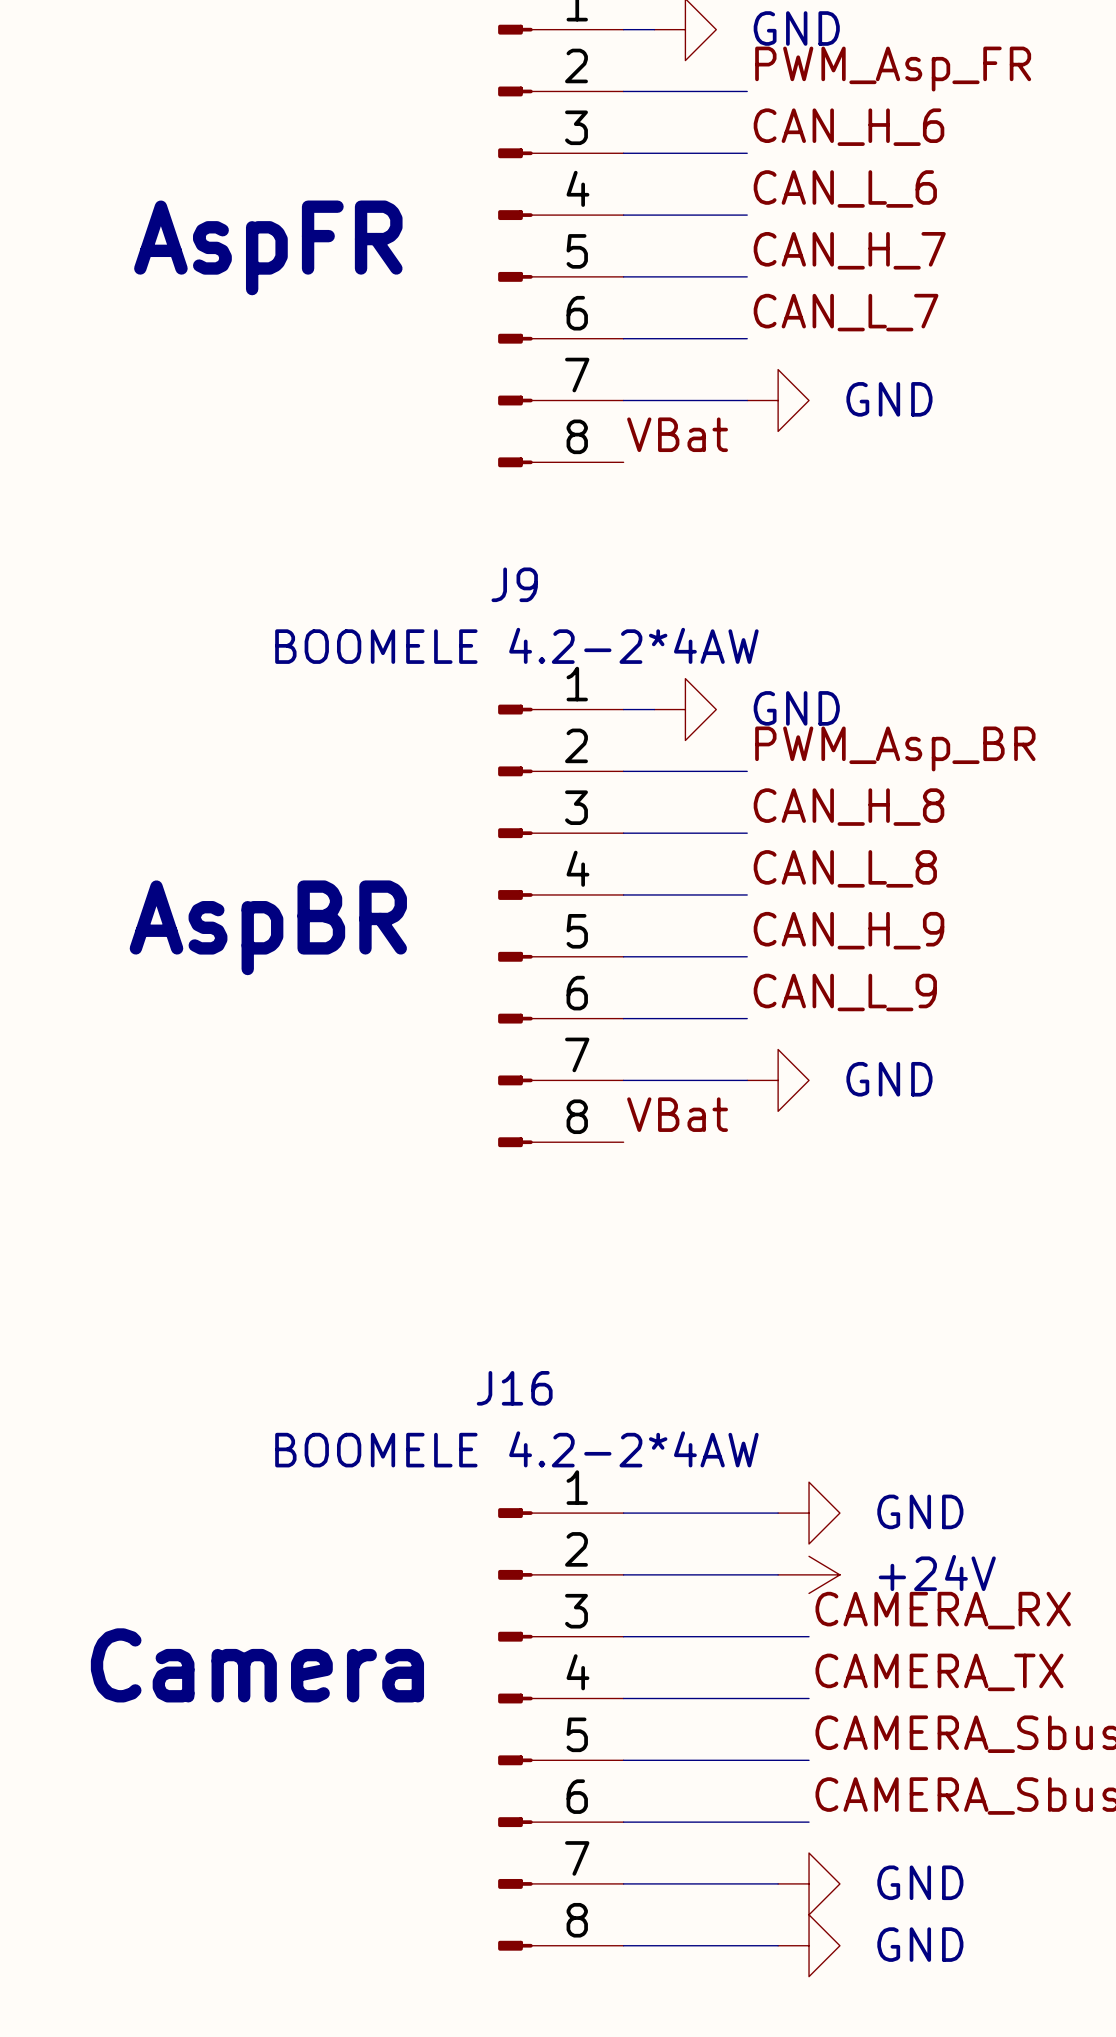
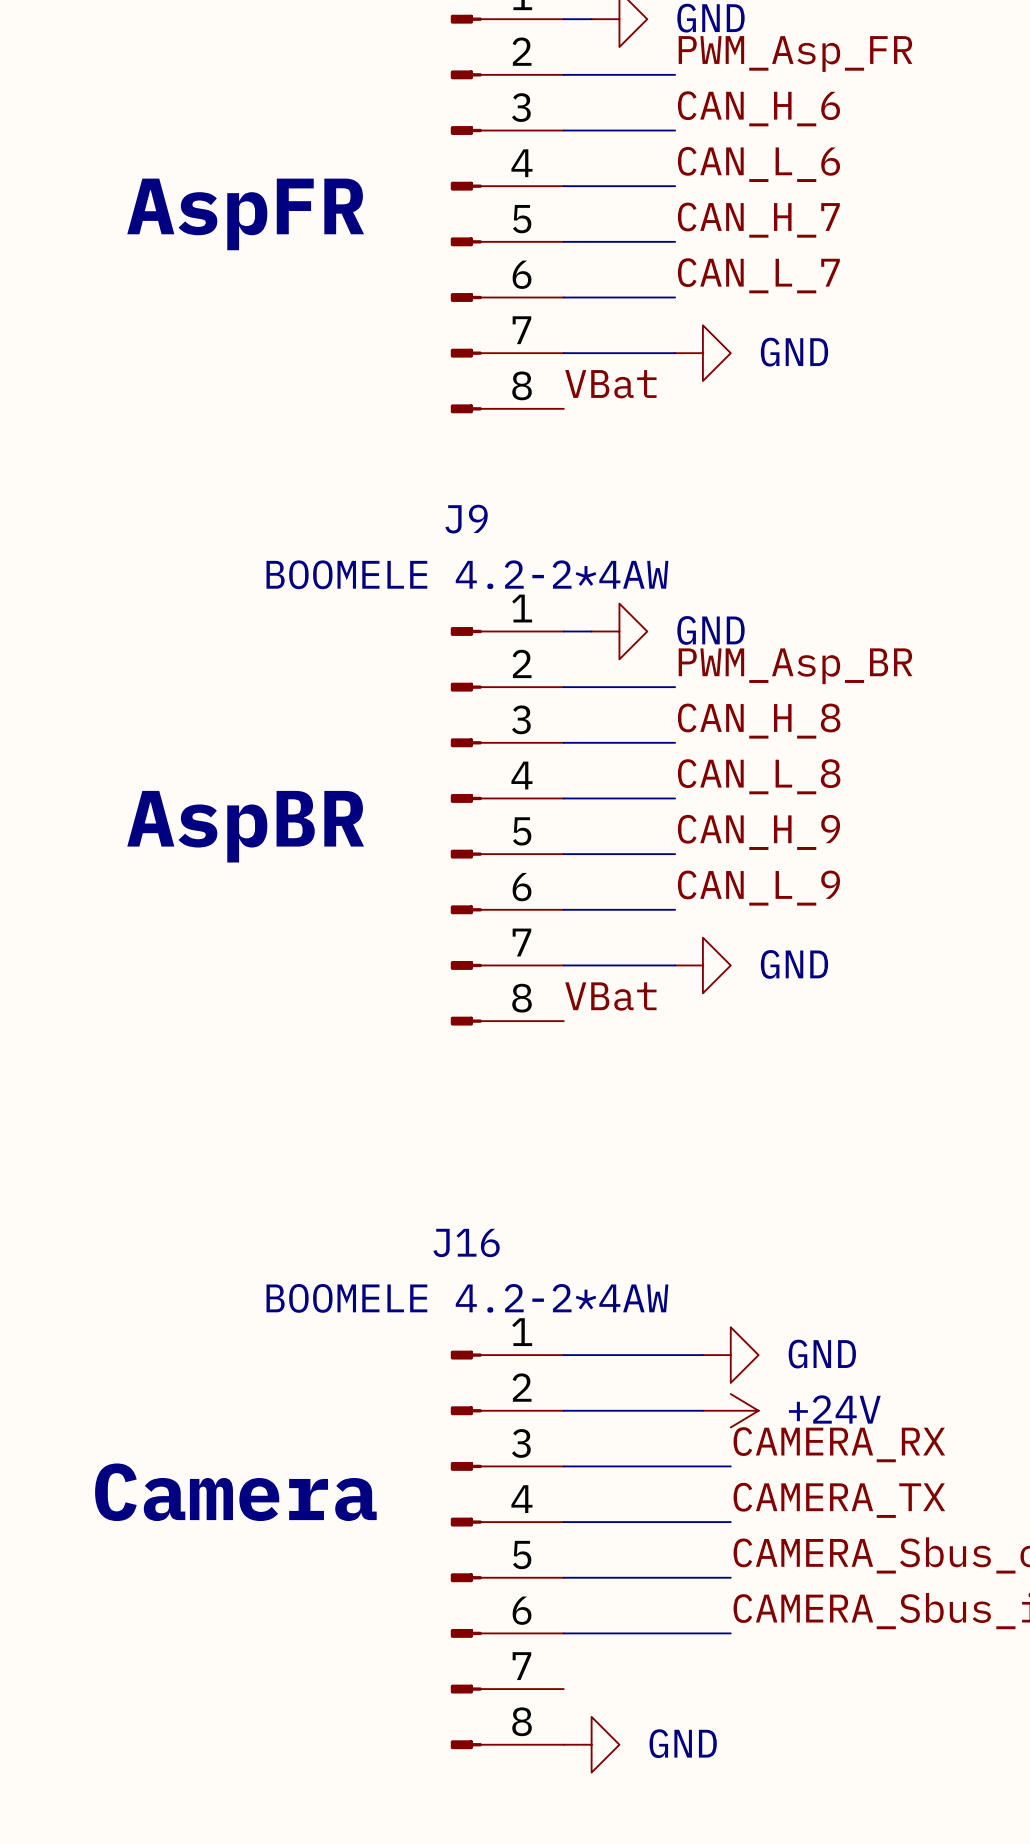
wire: (623, 1883) (778, 1883) -> none
power symbol: GND (809, 1883) -> none
wire: (623, 1945) (778, 1945) -> none
power symbol: none -> GND (591, 1744)
power symbol: GND (809, 1945) -> none

